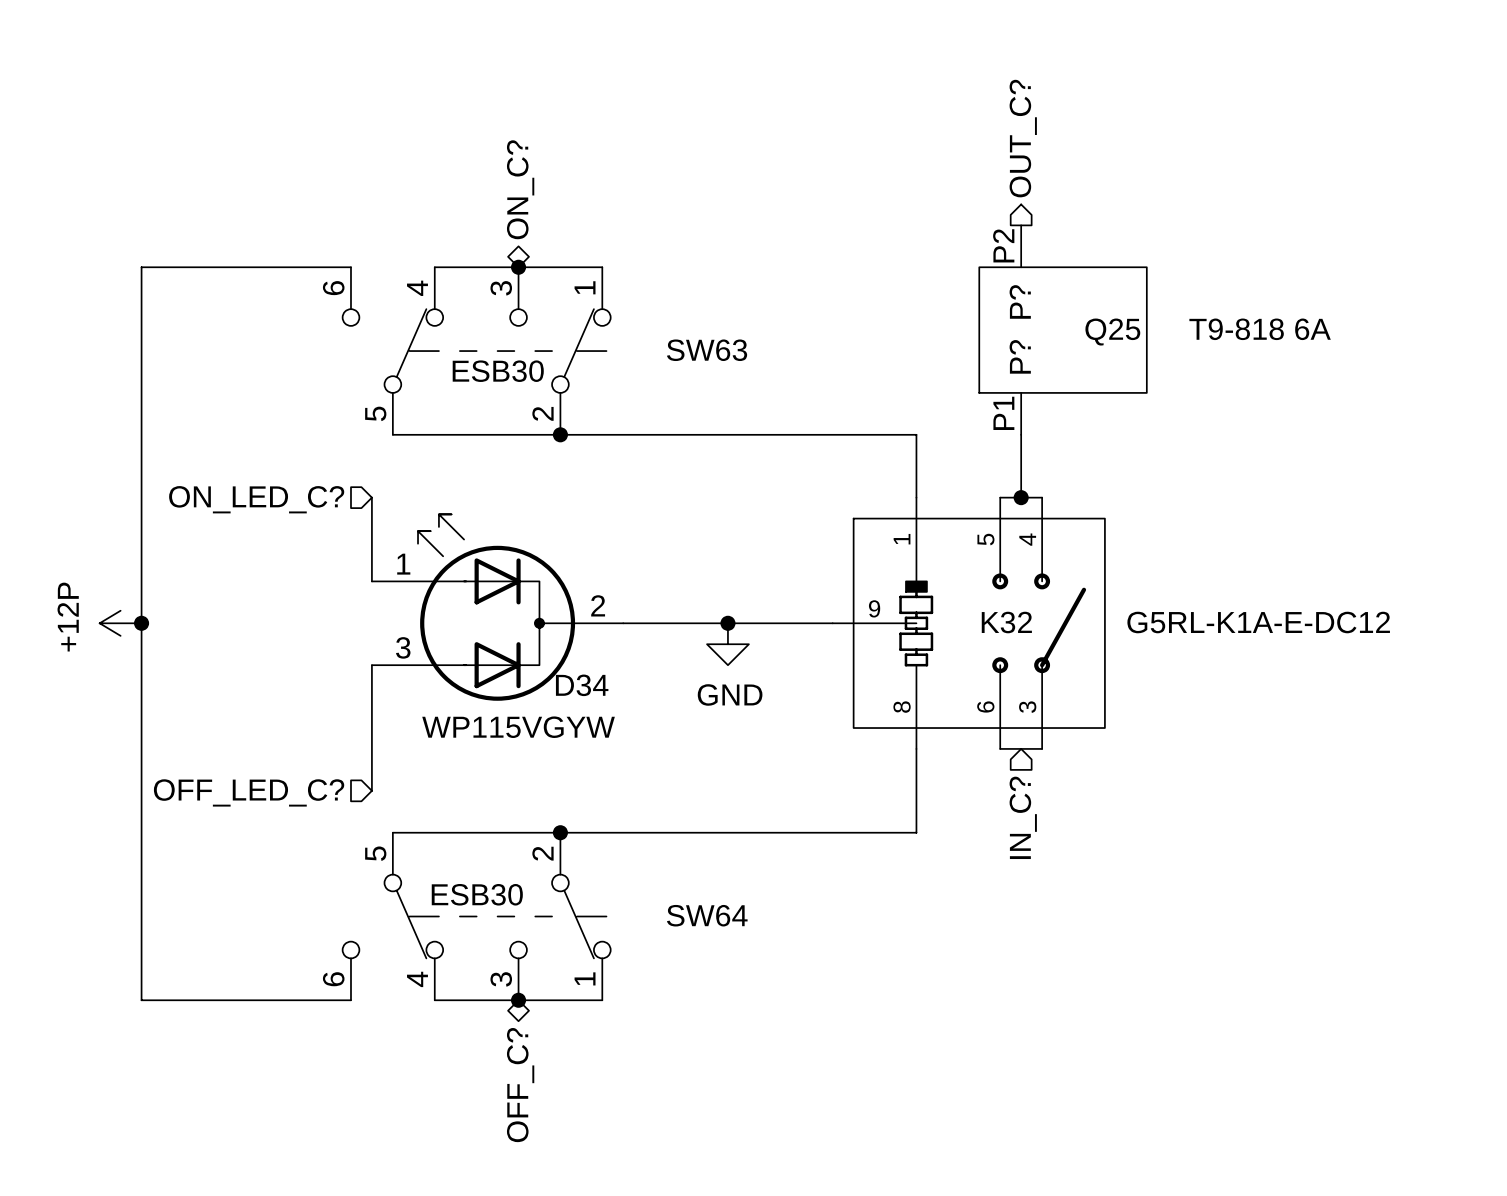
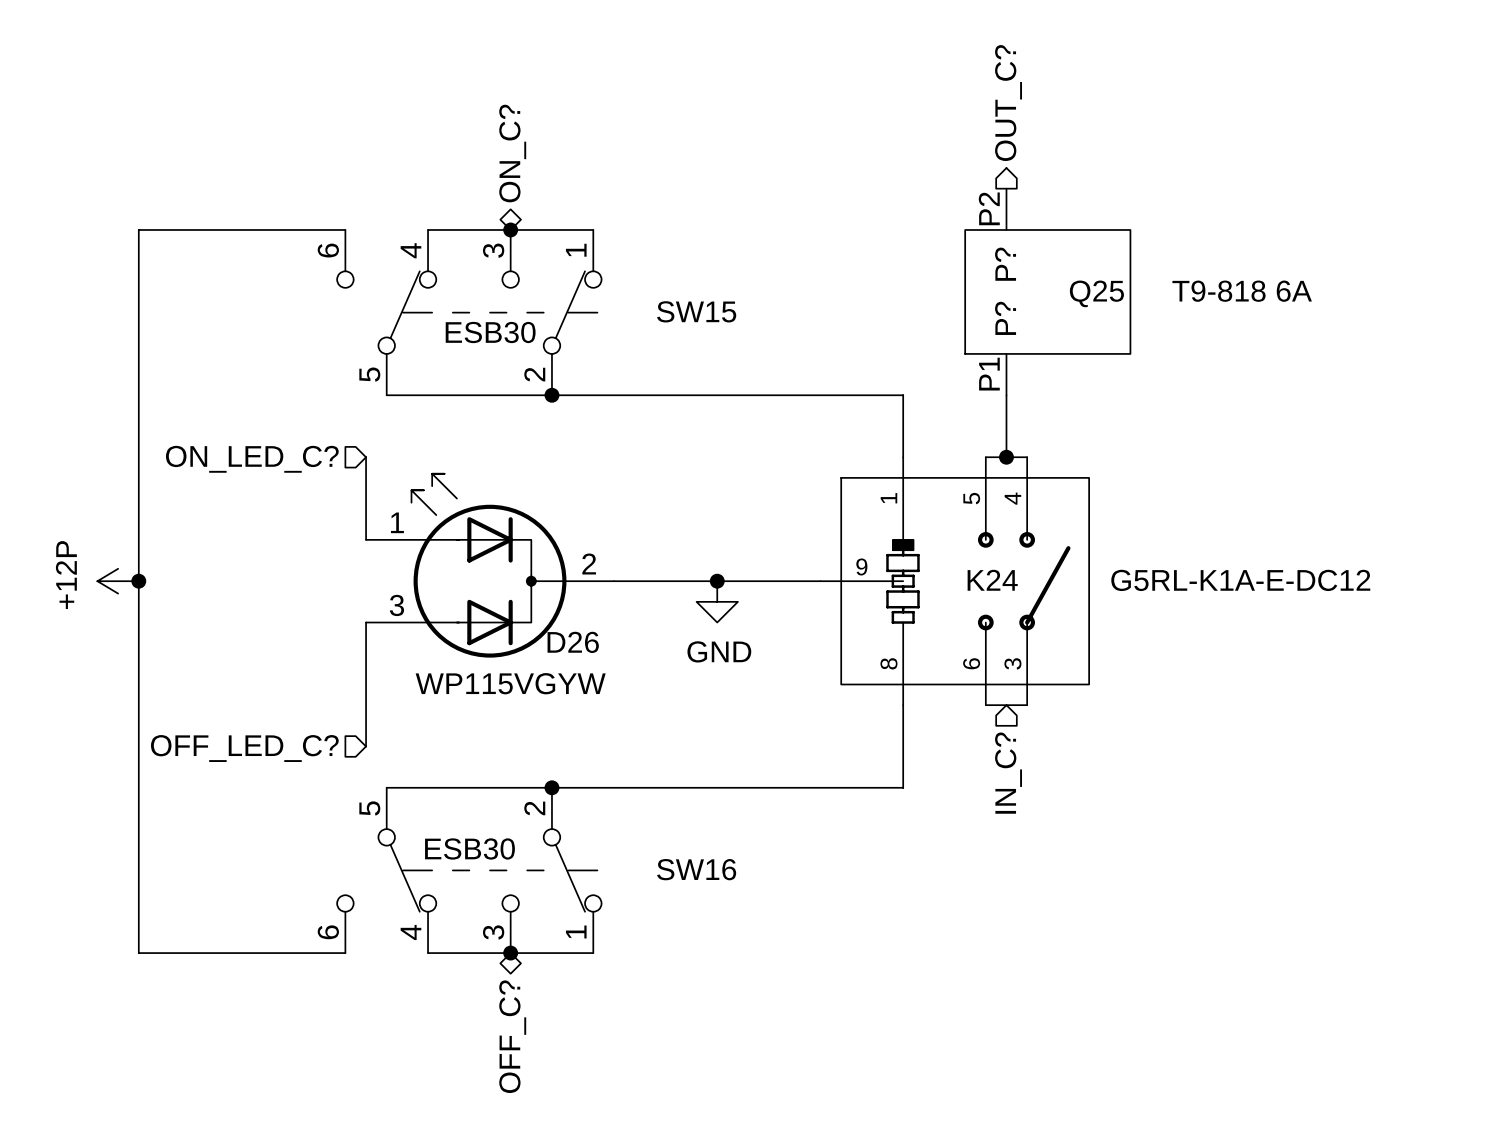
SW63 name: SW63 (707, 350) -> SW15 (696, 311)
K32 name: K32 (1006, 622) -> K24 (992, 580)
D34 name: D34 (582, 685) -> D26 (573, 642)
SW64 name: SW64 (707, 915) -> SW16 (696, 869)

